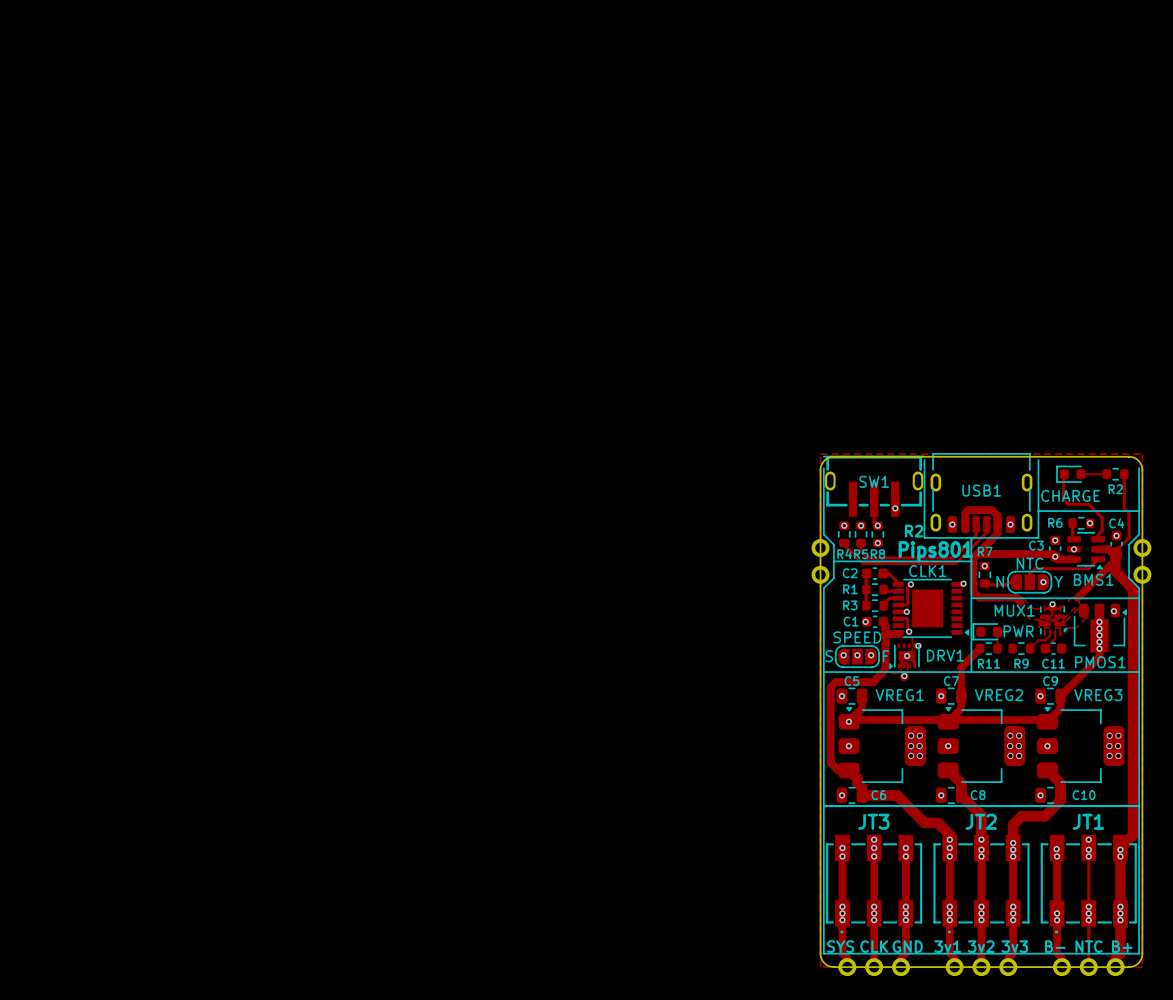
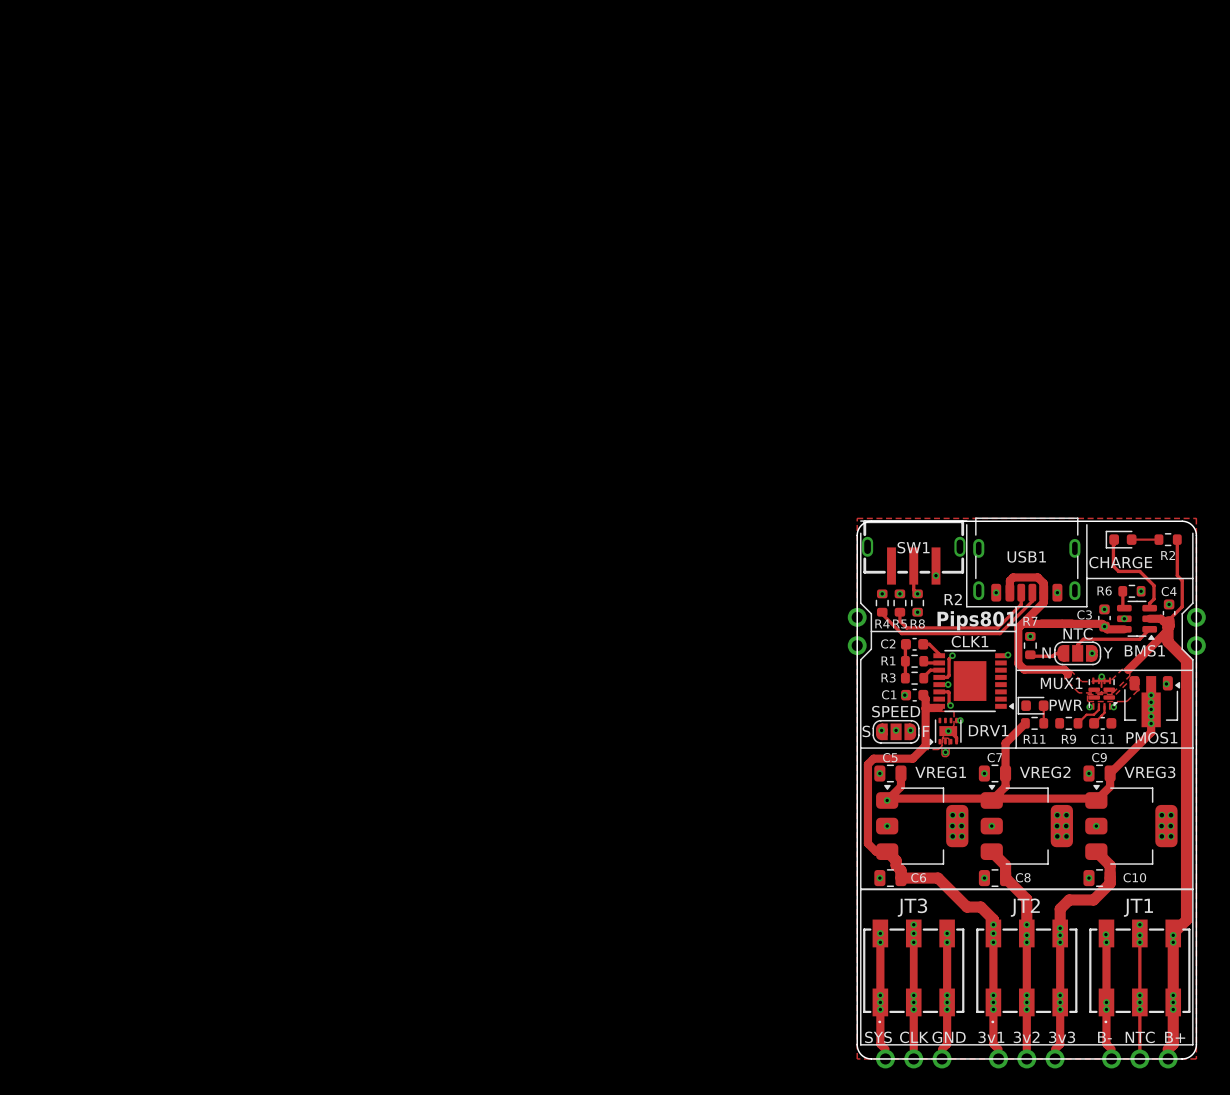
via: none -> (1089, 707)
via: none -> (1113, 707)

